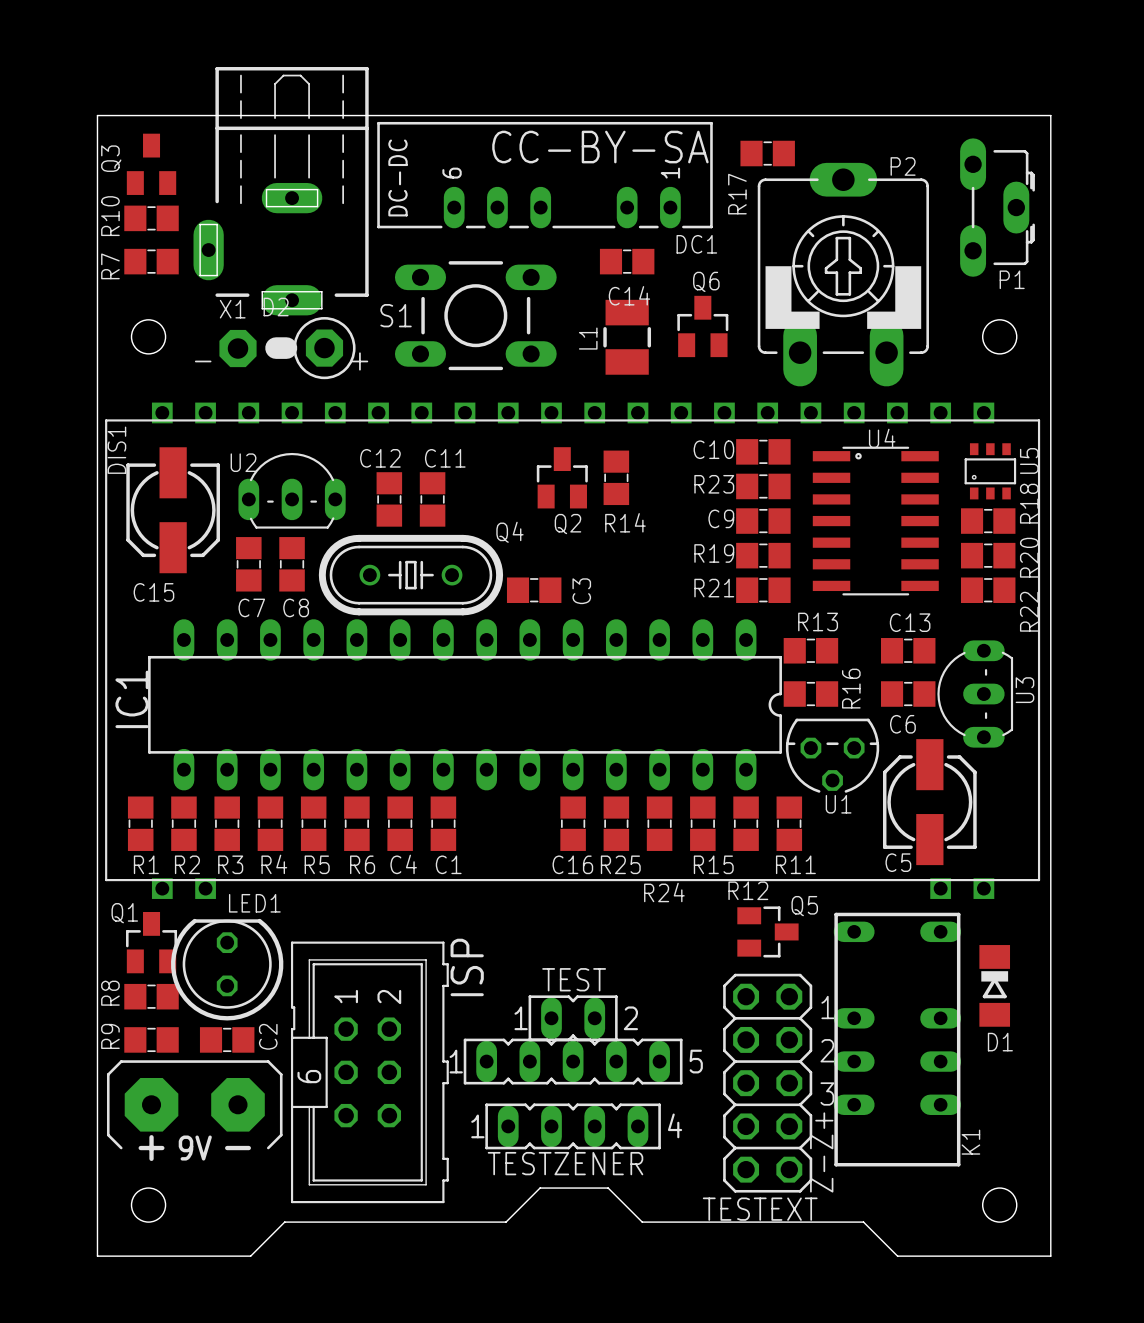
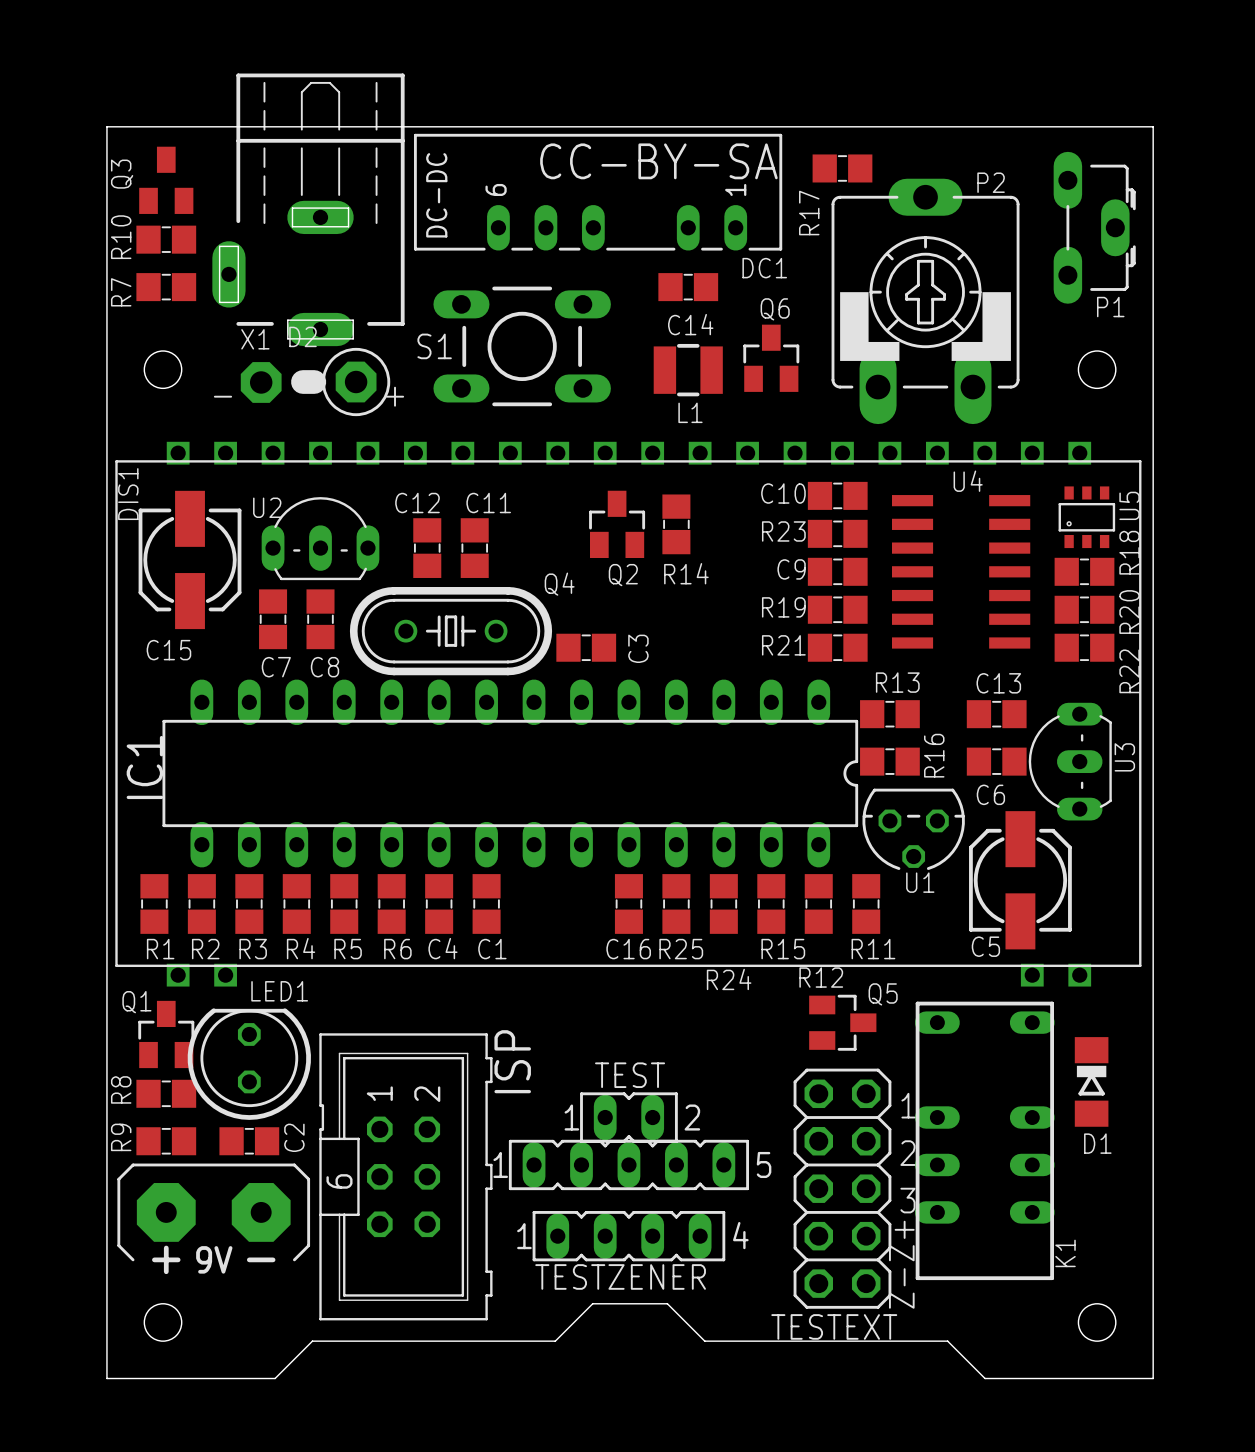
L1 footprint: [603, 299, 652, 375] -> [653, 343, 723, 397]
L1 name position: L1 (588, 338) -> L1 (690, 412)
U4 footprint: [812, 446, 939, 596] -> [891, 495, 1031, 649]

